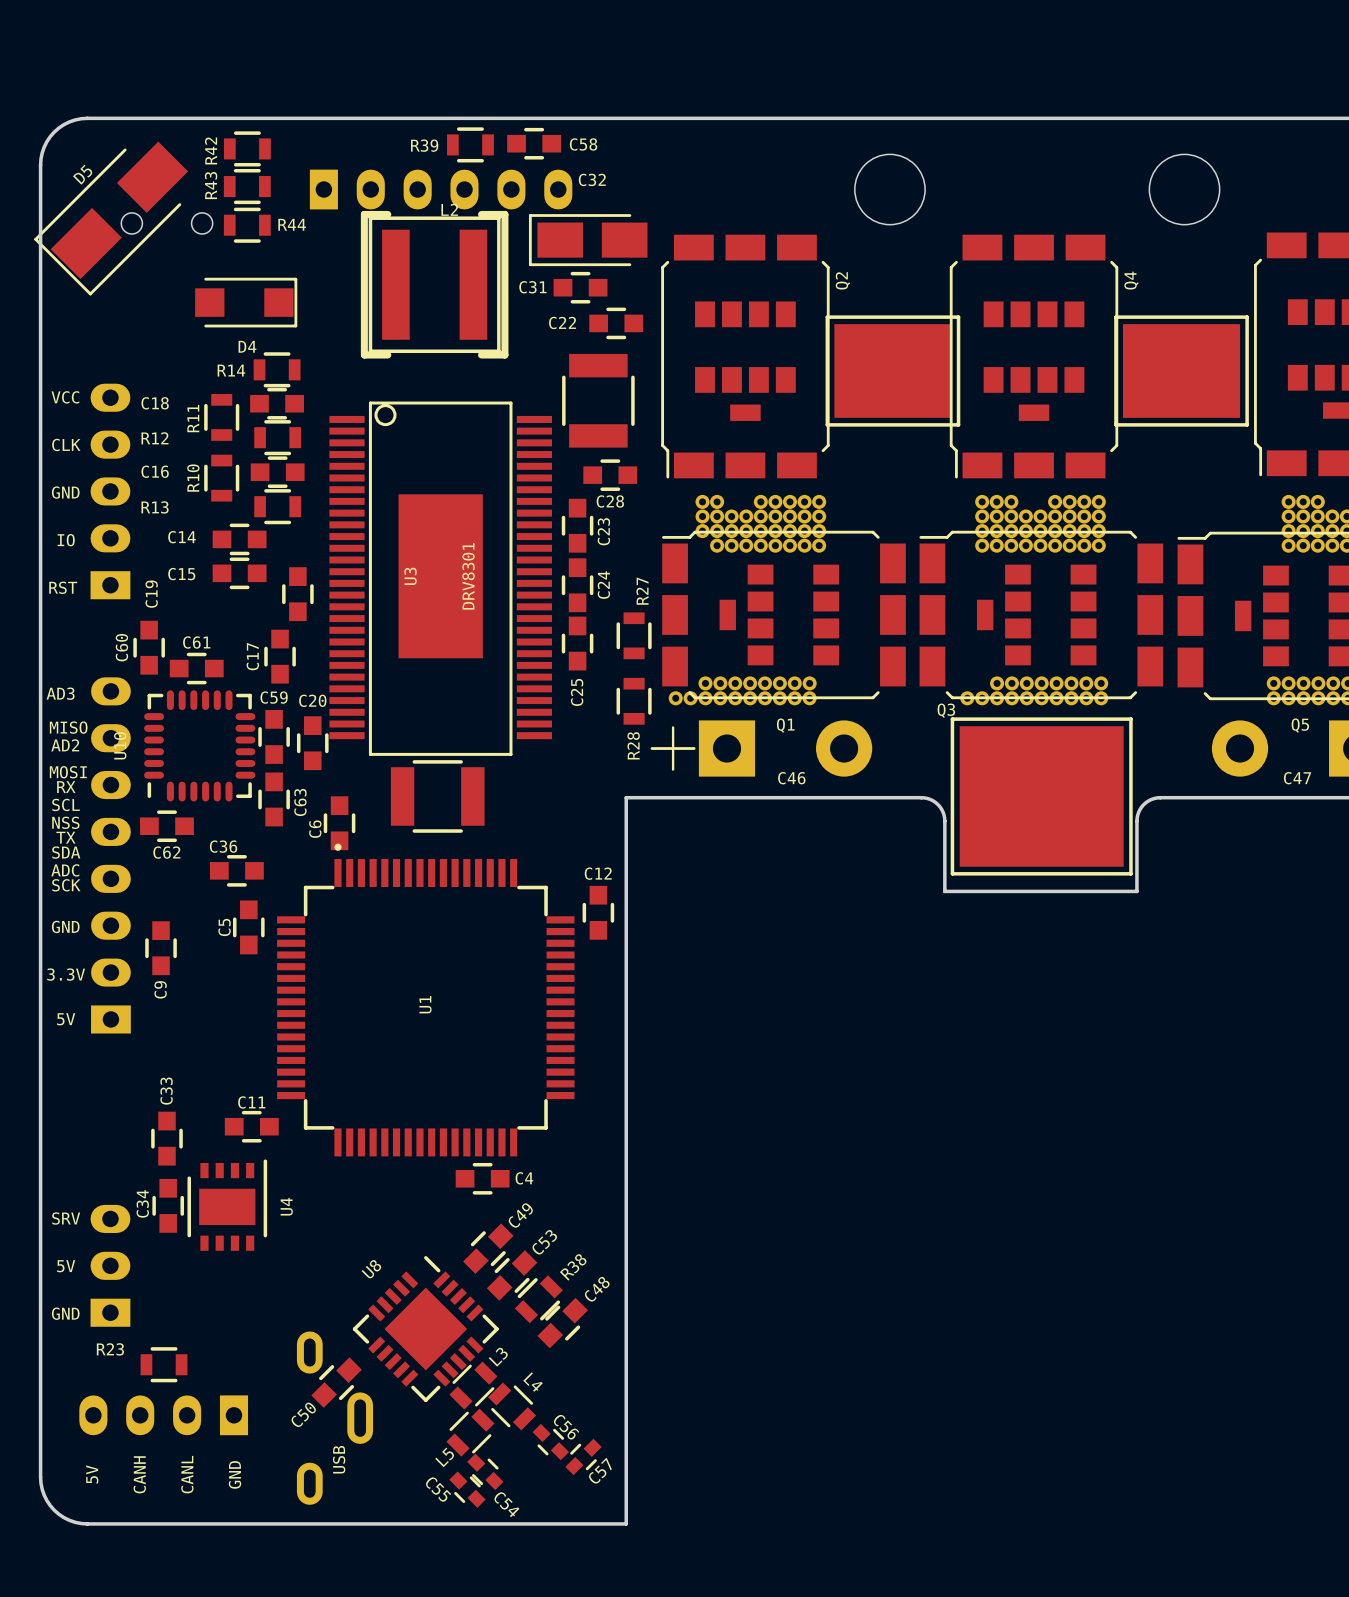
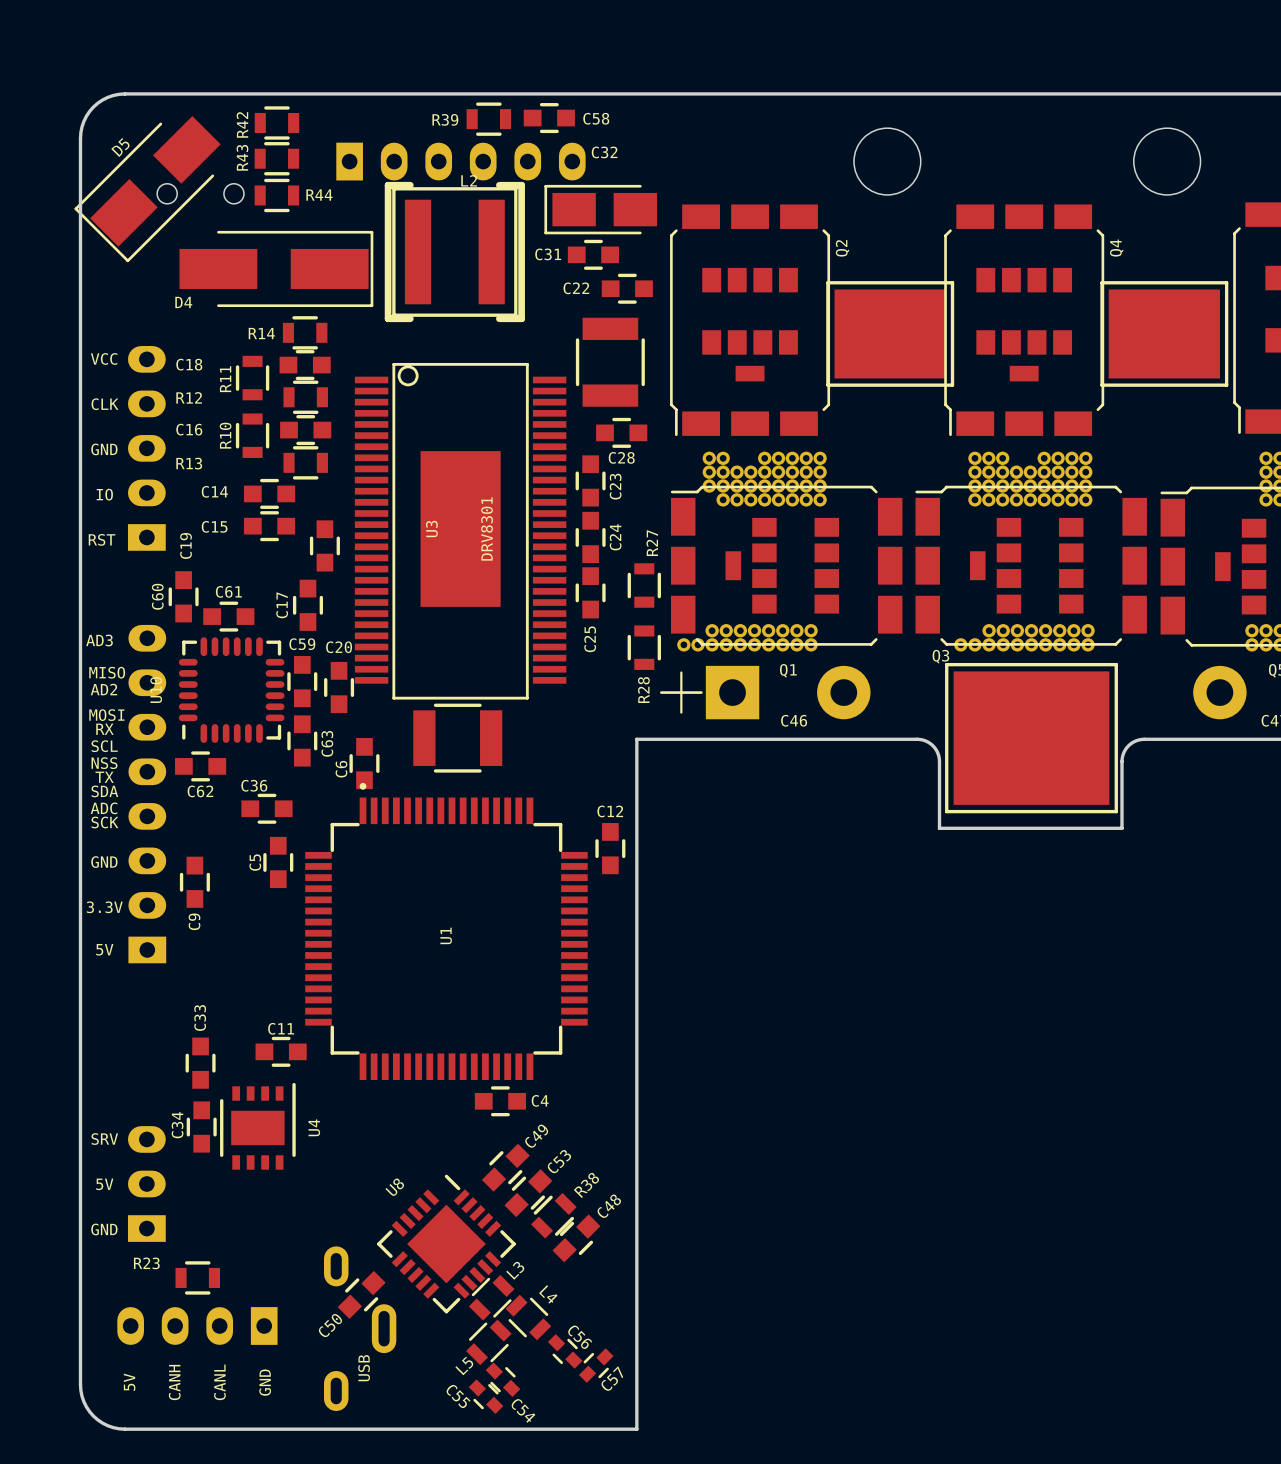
D4 footprint: [195, 277, 298, 328] -> [179, 230, 374, 308]
D4 name position: D4 (247, 346) -> D4 (183, 302)

